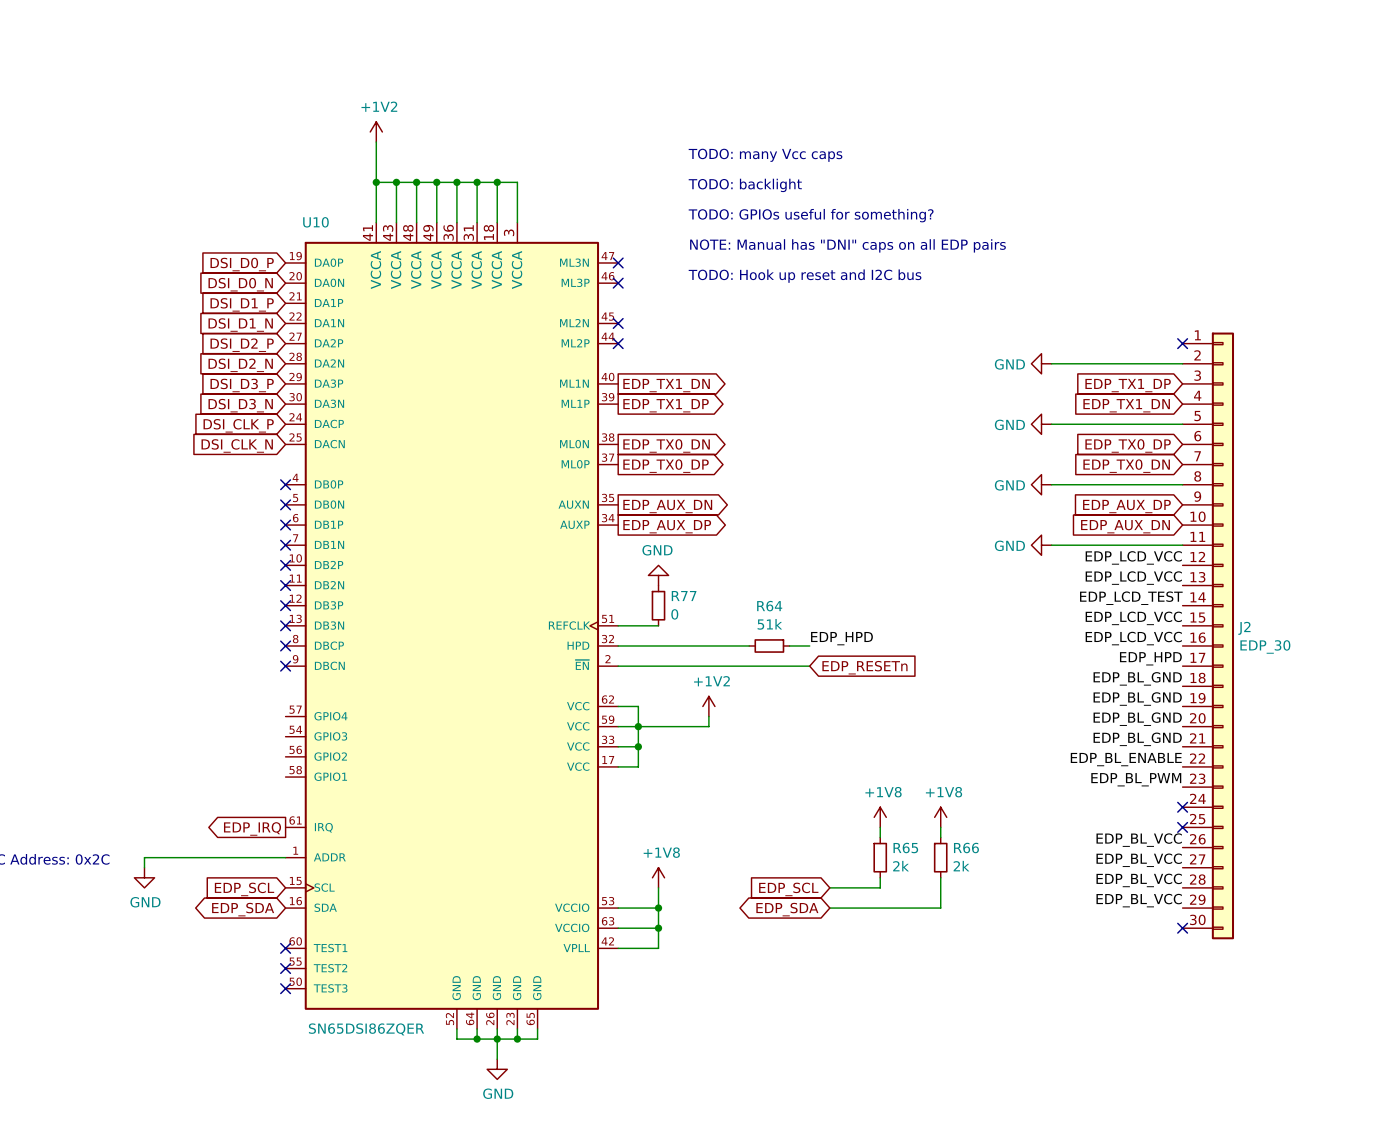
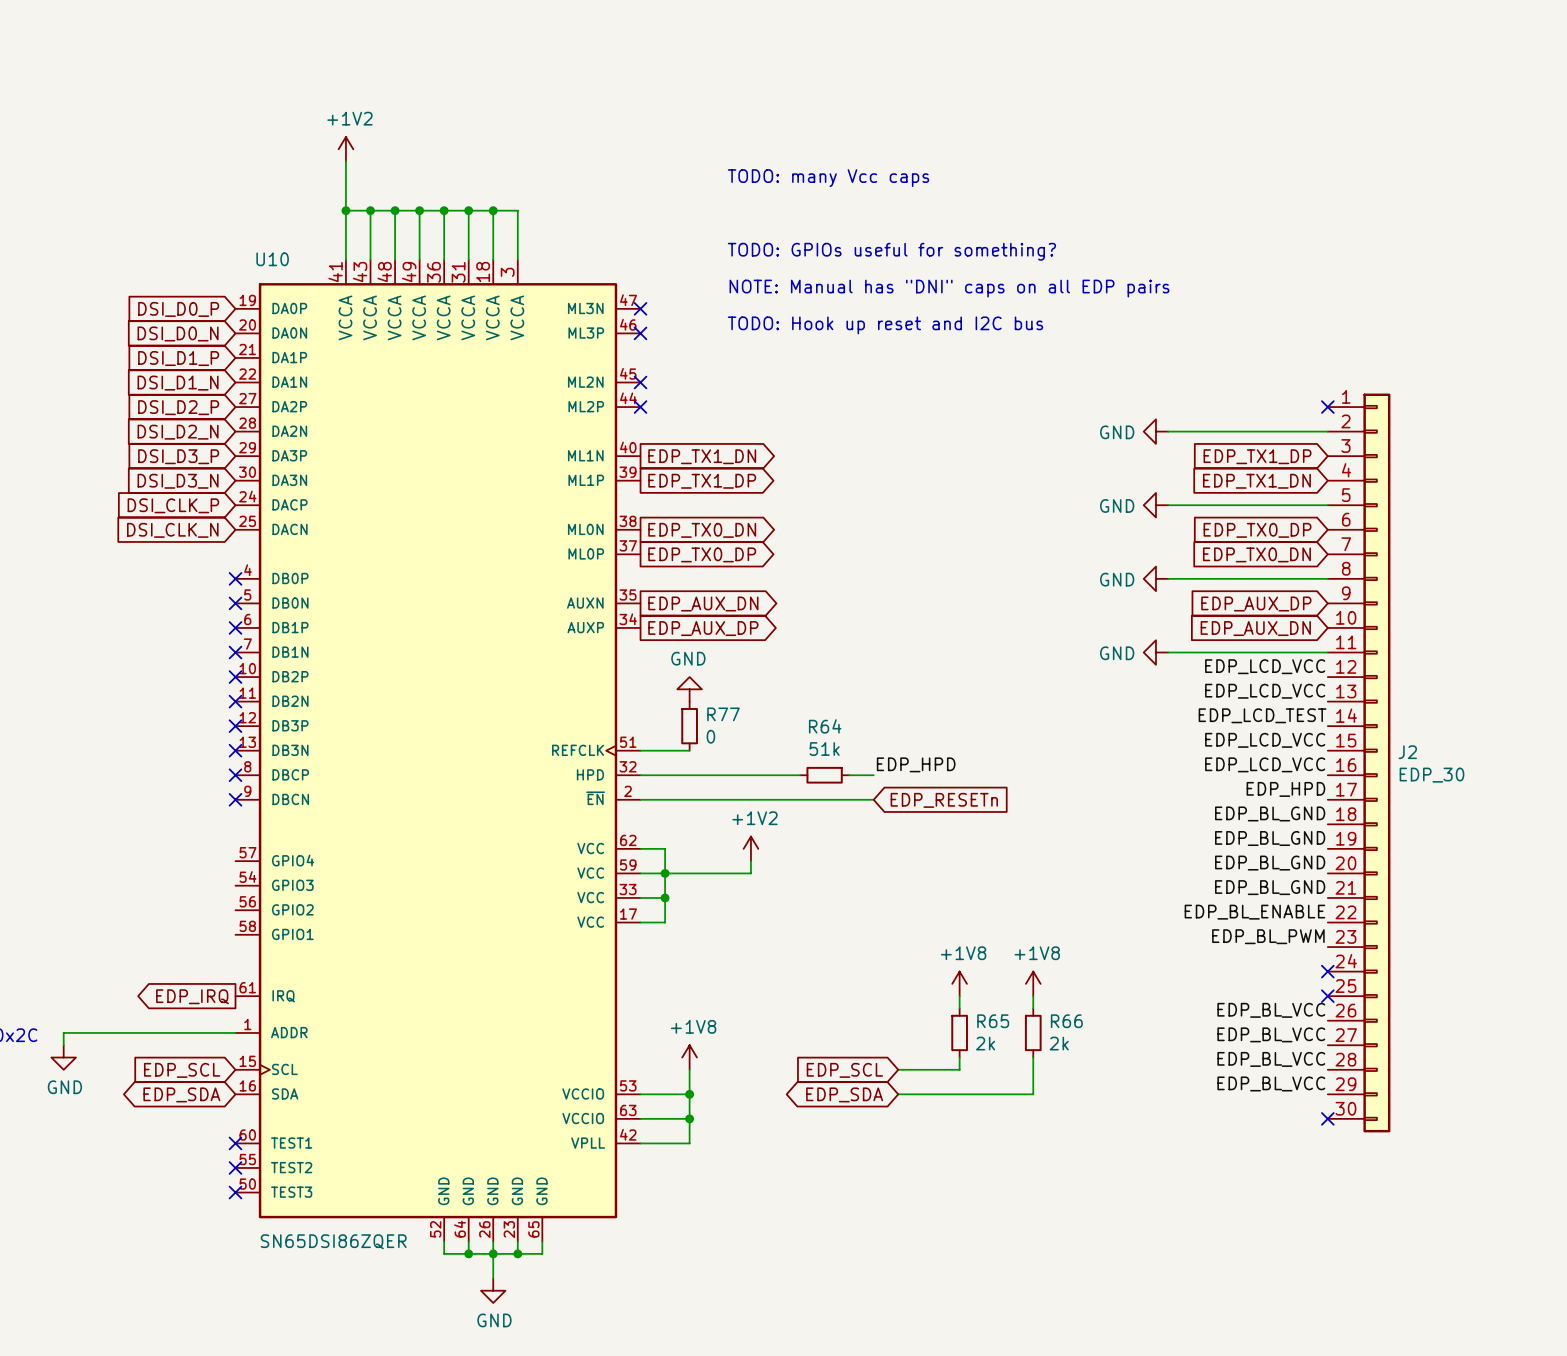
text: TODO: backlight (745, 185) -> none

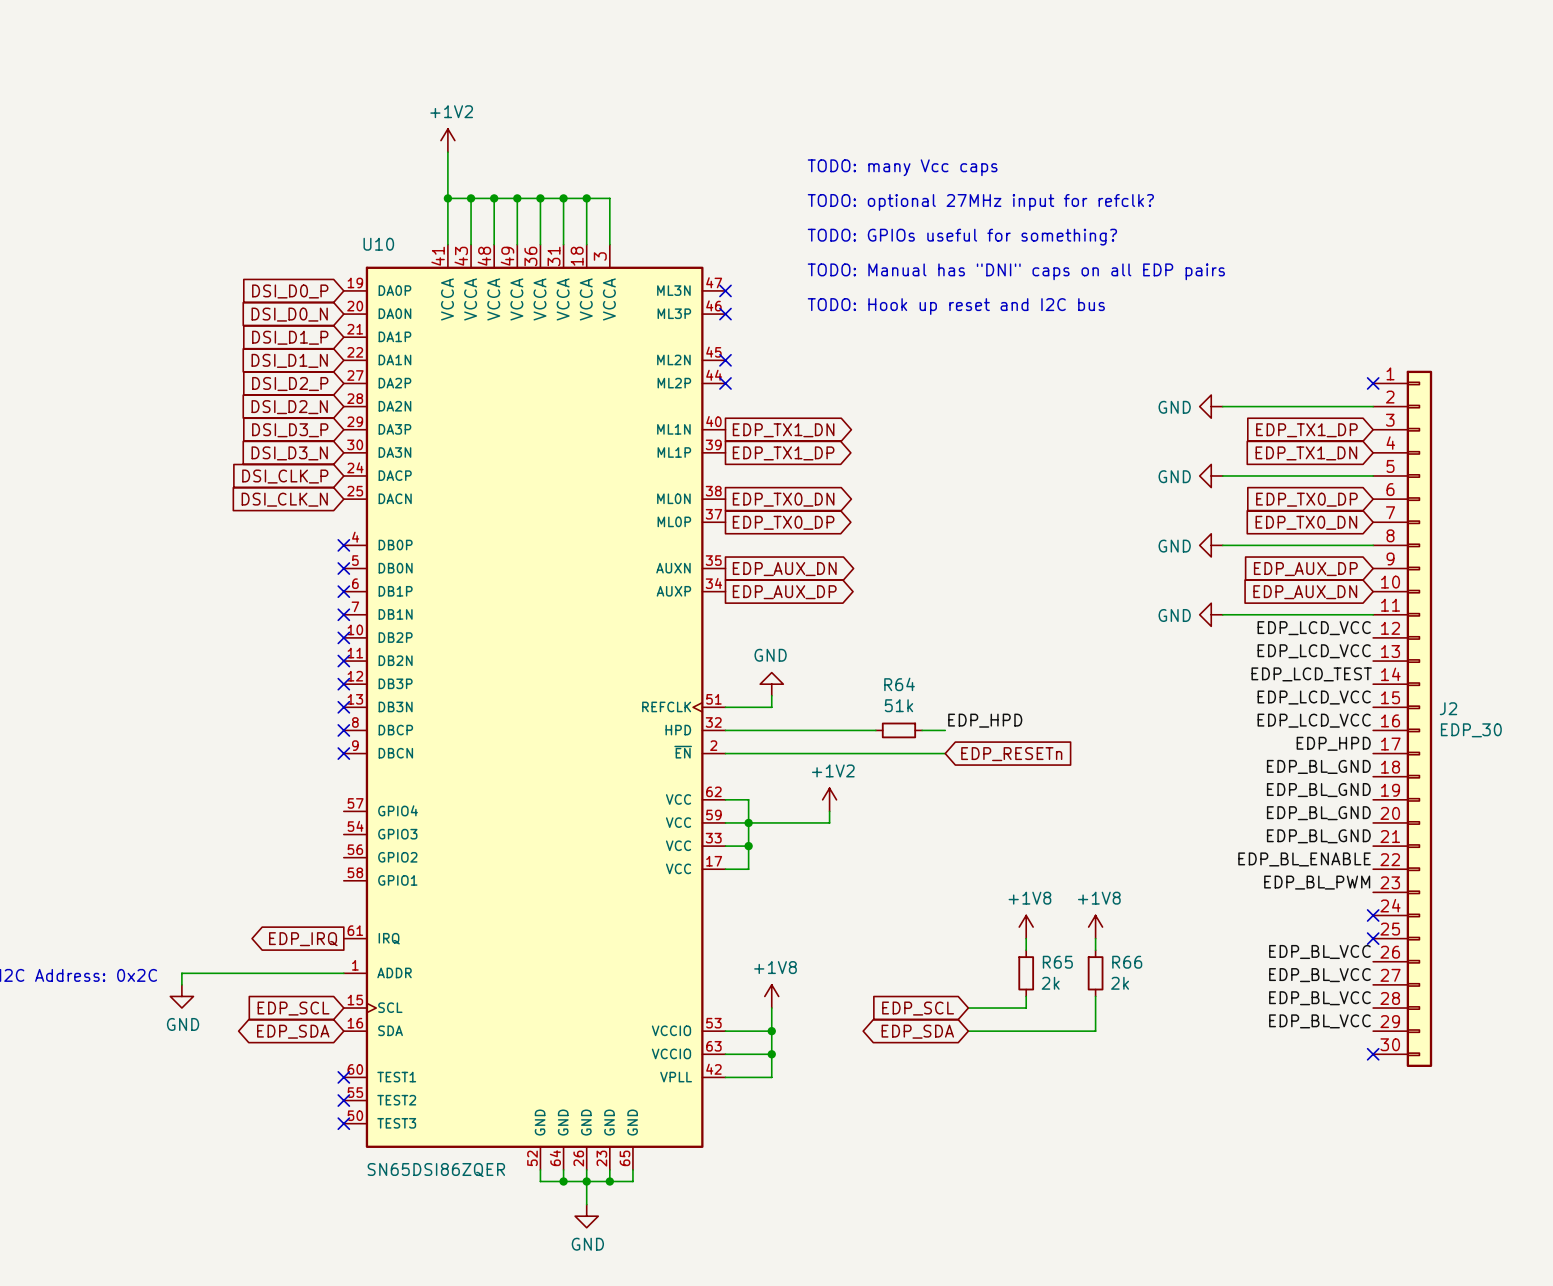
text: none -> TODO: optional 27MHz input for refclk? (980, 202)
text: NOTE: Manual has "DNI" caps on all EDP pairs (949, 288) -> TODO: Manual has "DNI" caps on all EDP pairs (1016, 271)
power symbol position: GND (689, 689) -> GND (771, 684)
R77: 0 (689, 726) -> none

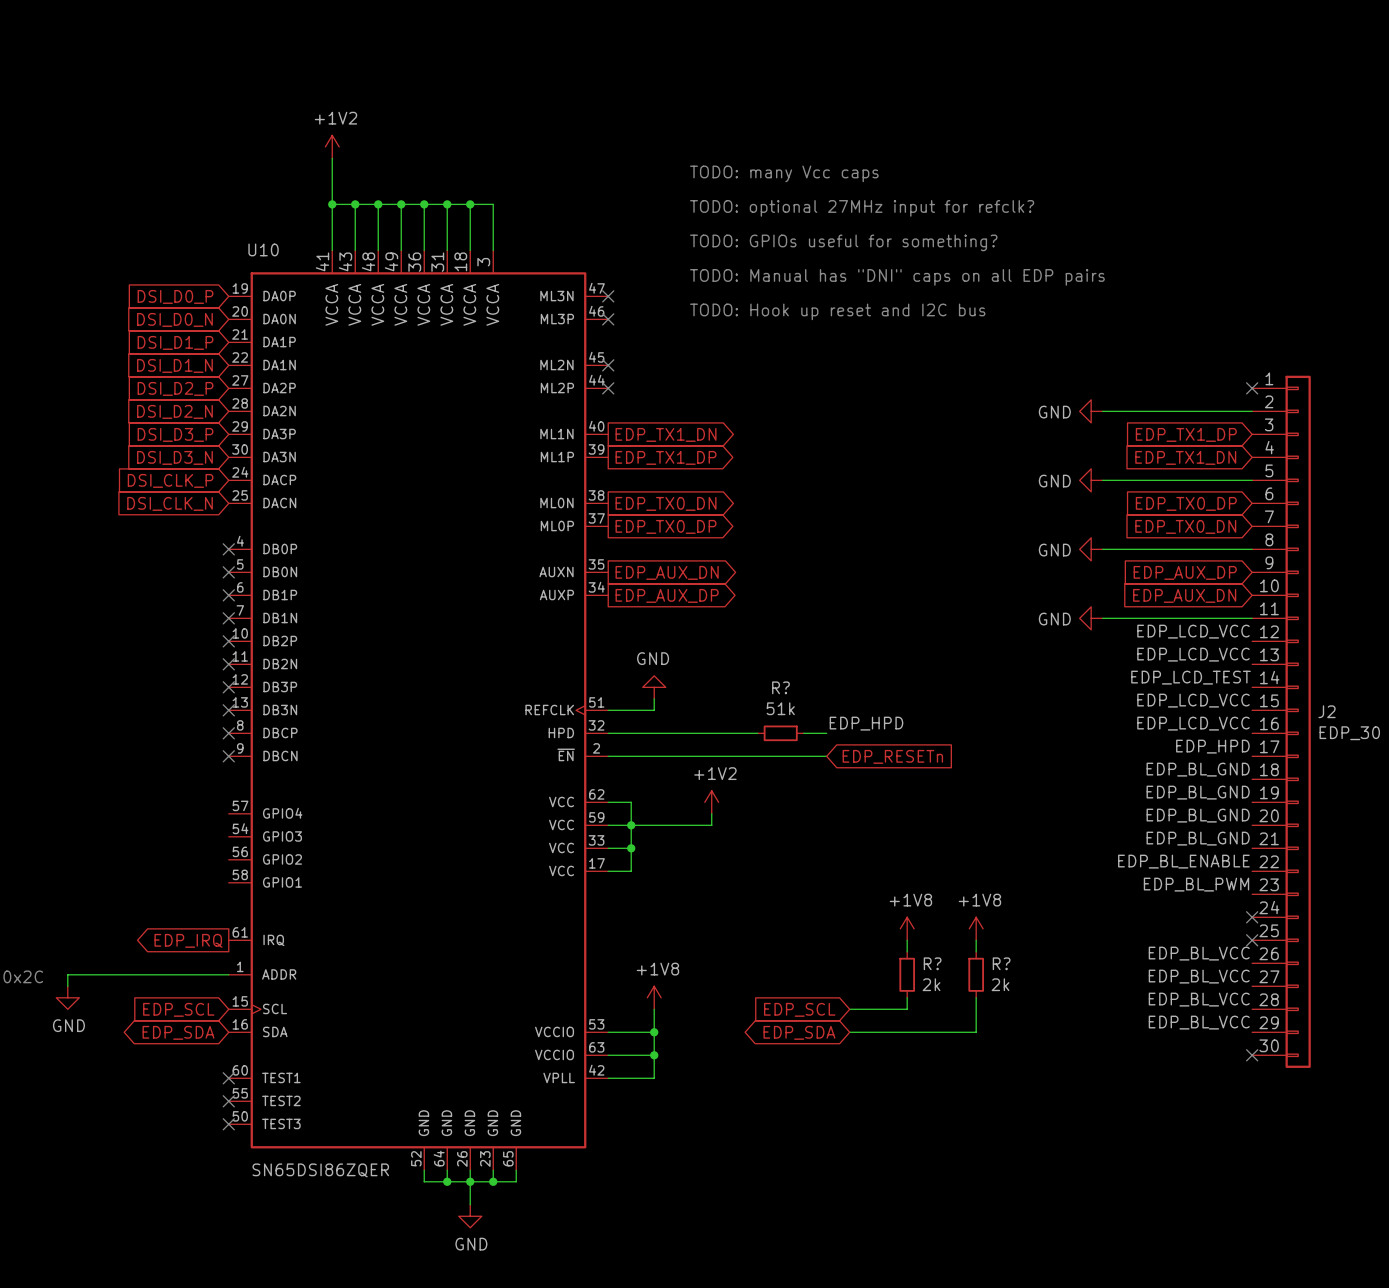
R64 name: R64 (899, 684) -> R? (780, 687)
R65 name: R65 (1057, 962) -> R? (932, 963)
R66 name: R66 (1127, 962) -> R? (1001, 963)

